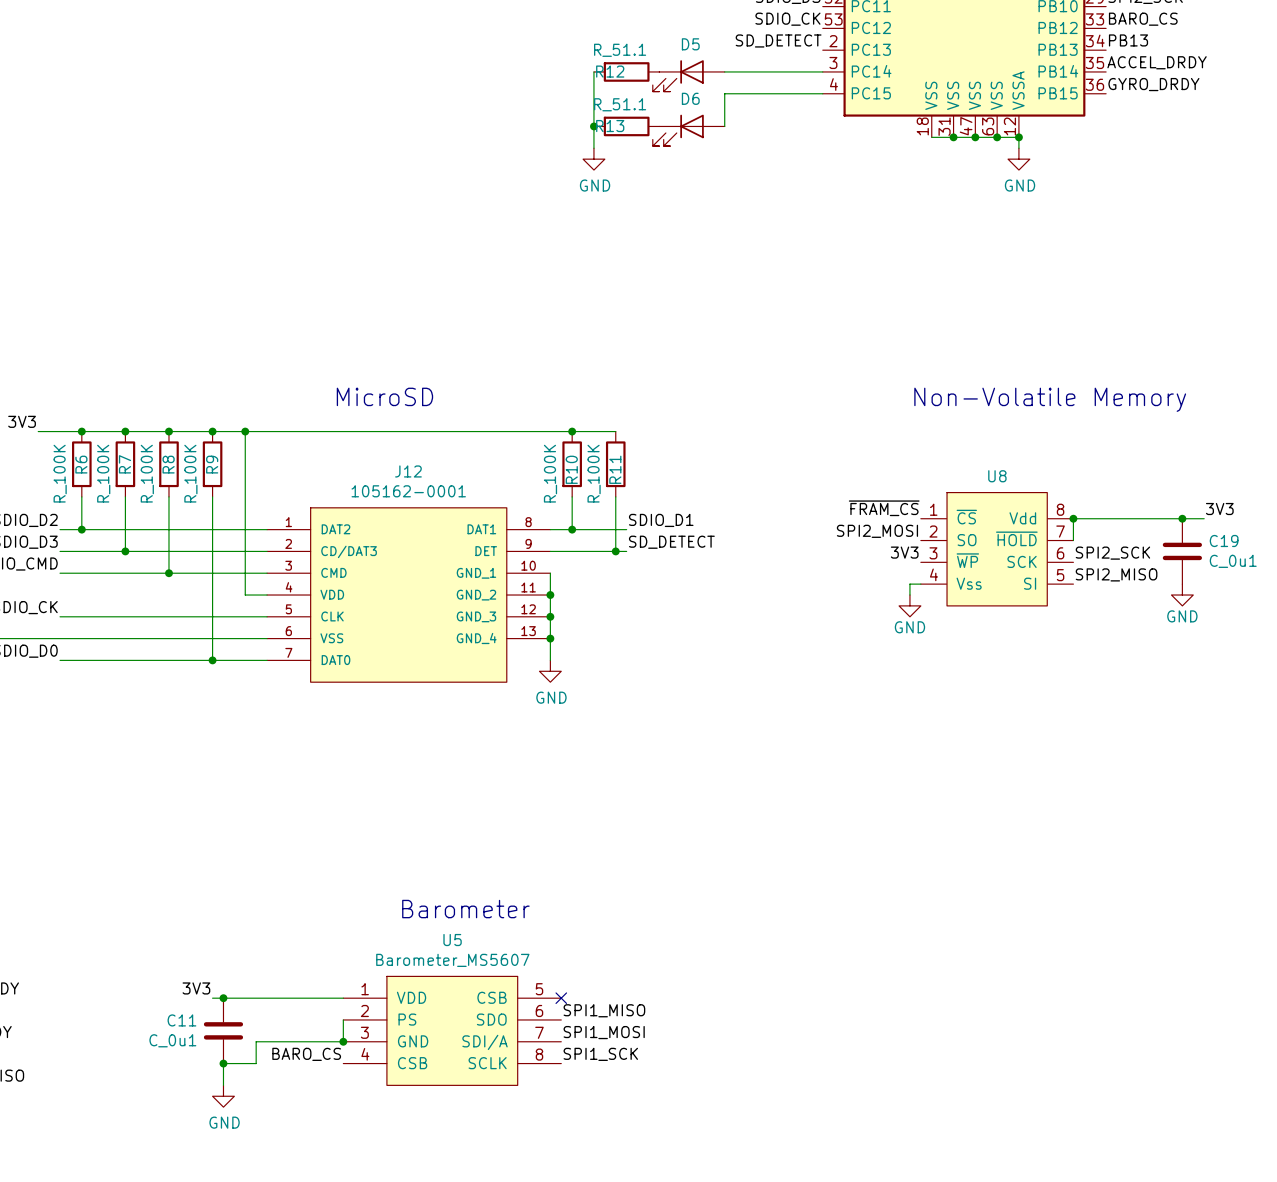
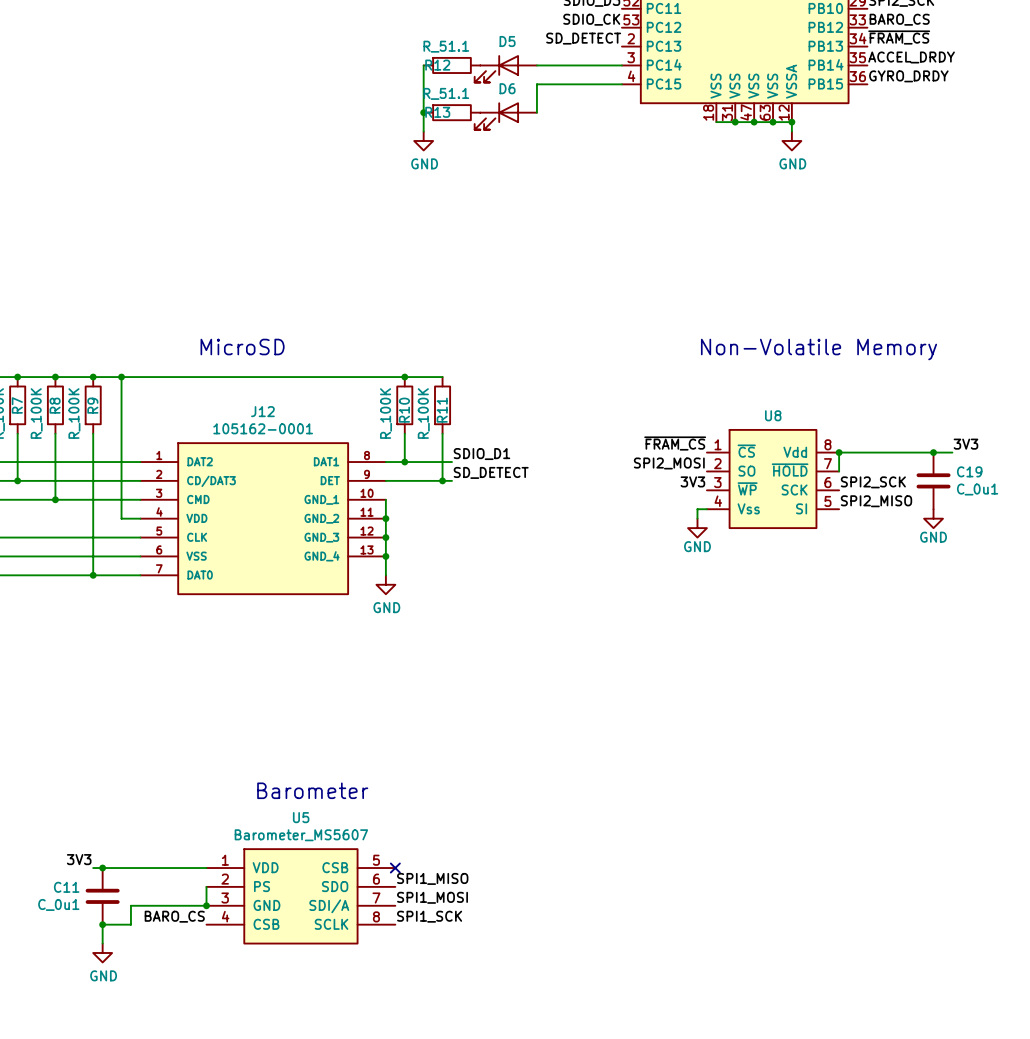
label: PB13 (1128, 40) -> ~{FRAM_CS} (899, 37)

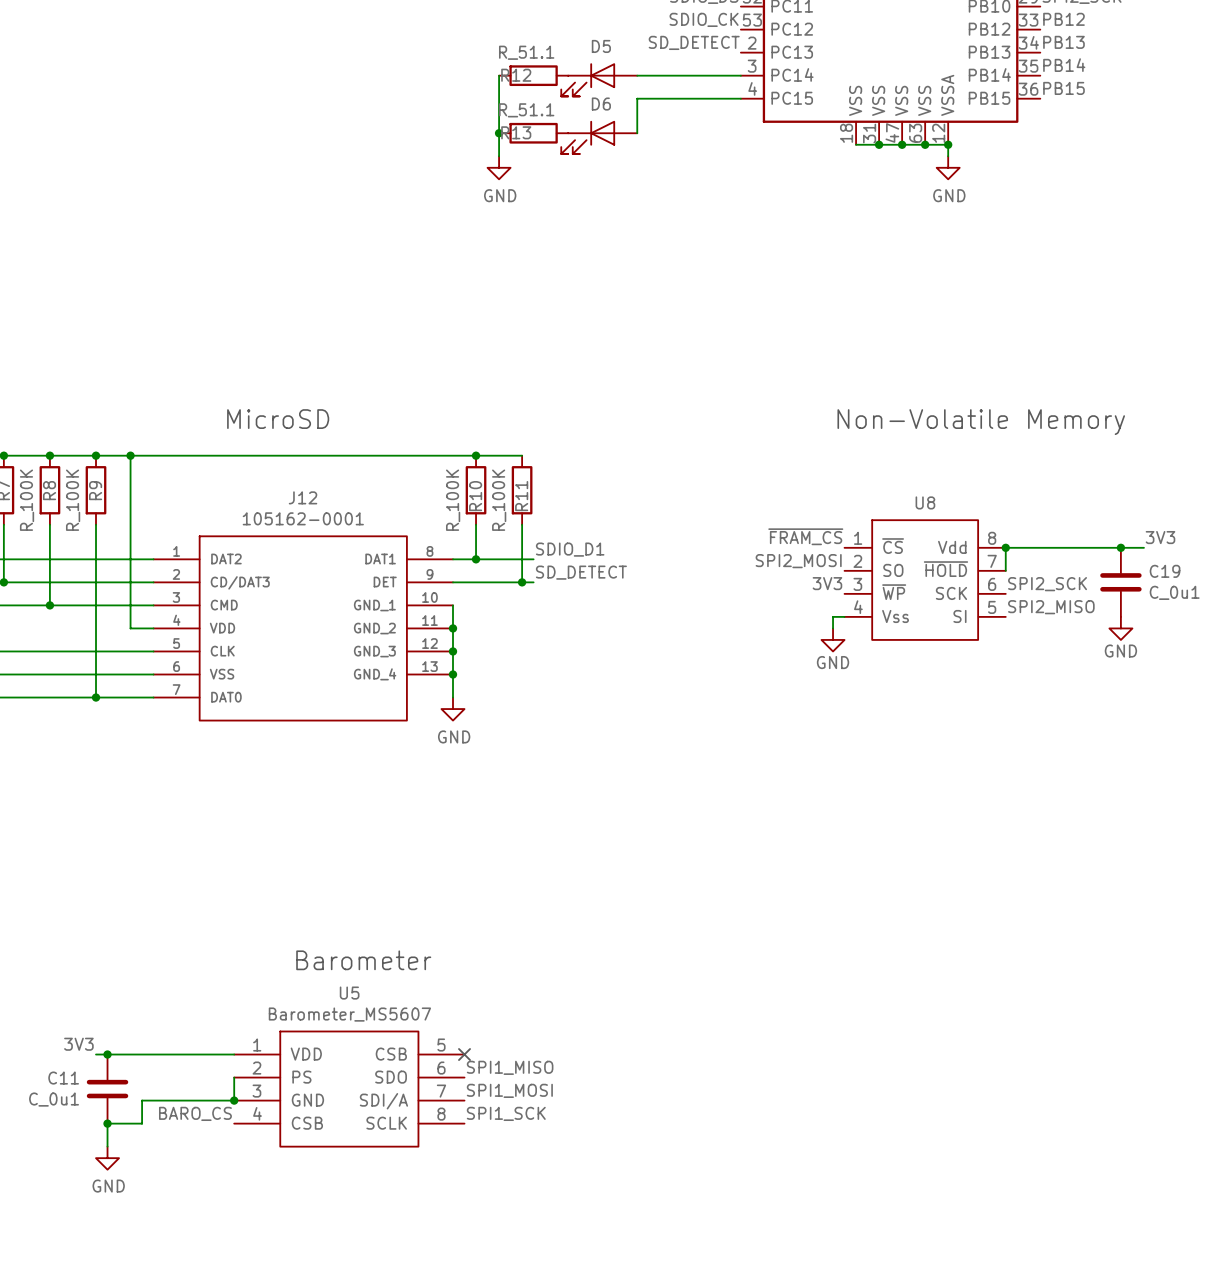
label: BARO_CS (899, 19) -> PB12 (1063, 19)
label: ~{FRAM_CS} (899, 37) -> PB13 (1063, 42)
label: ACCEL_DRDY (911, 57) -> PB14 (1064, 65)
label: GYRO_DRDY (908, 76) -> PB15 (1063, 88)

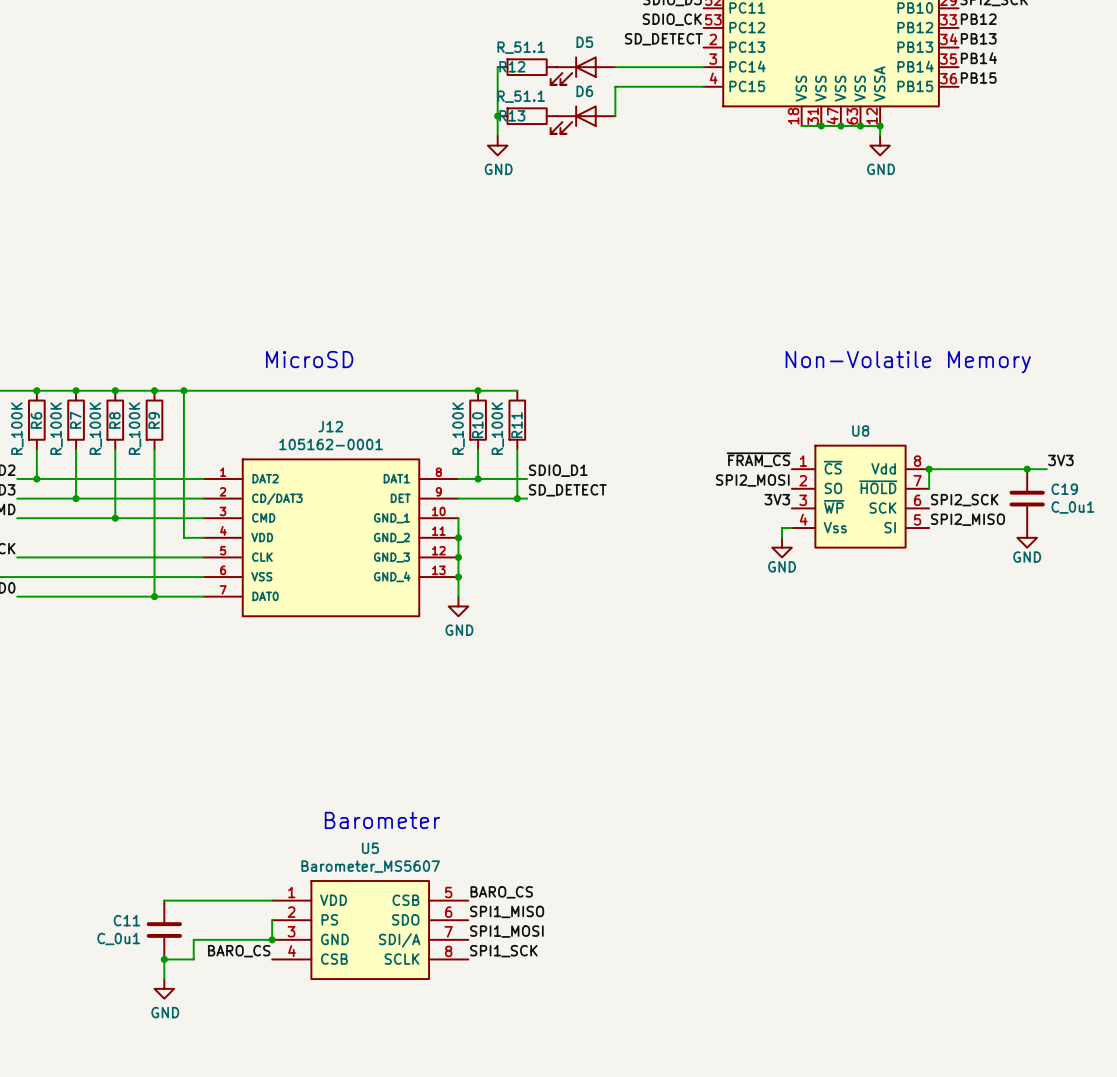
label: 3V3 (78, 1044) -> none
label: none -> BARO_CS (501, 892)
wire: (96, 1054) (107, 1054) -> none
junction: (107, 1054) -> none
no-connect mark: (464, 1054) -> none

